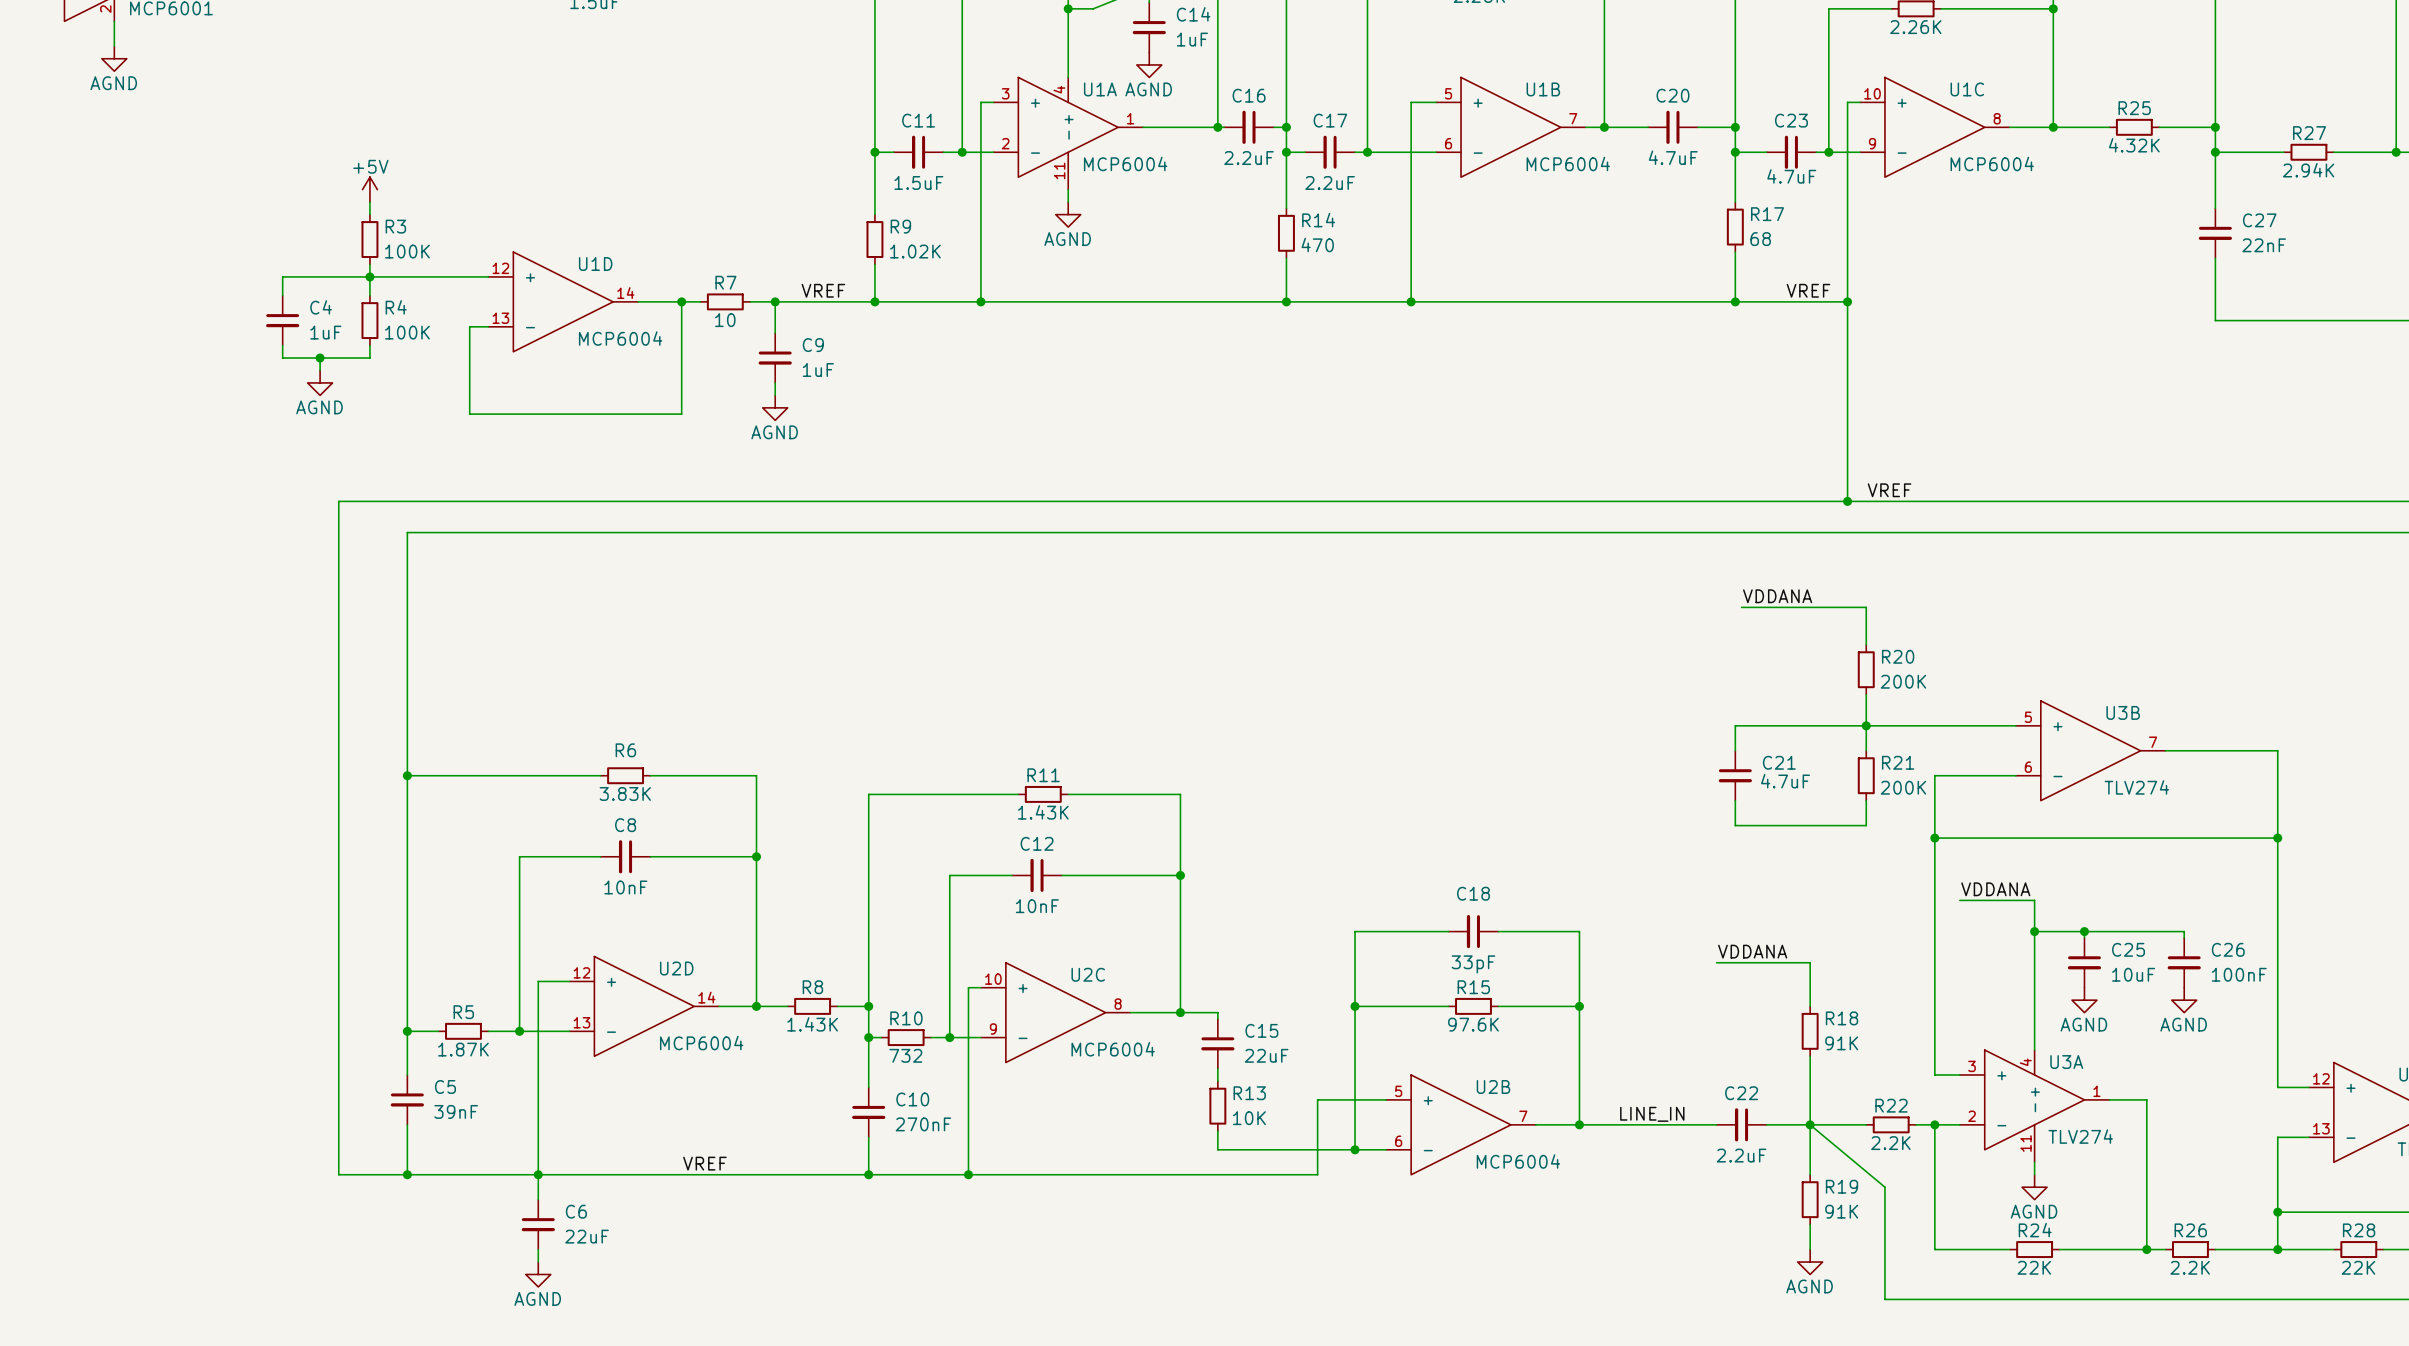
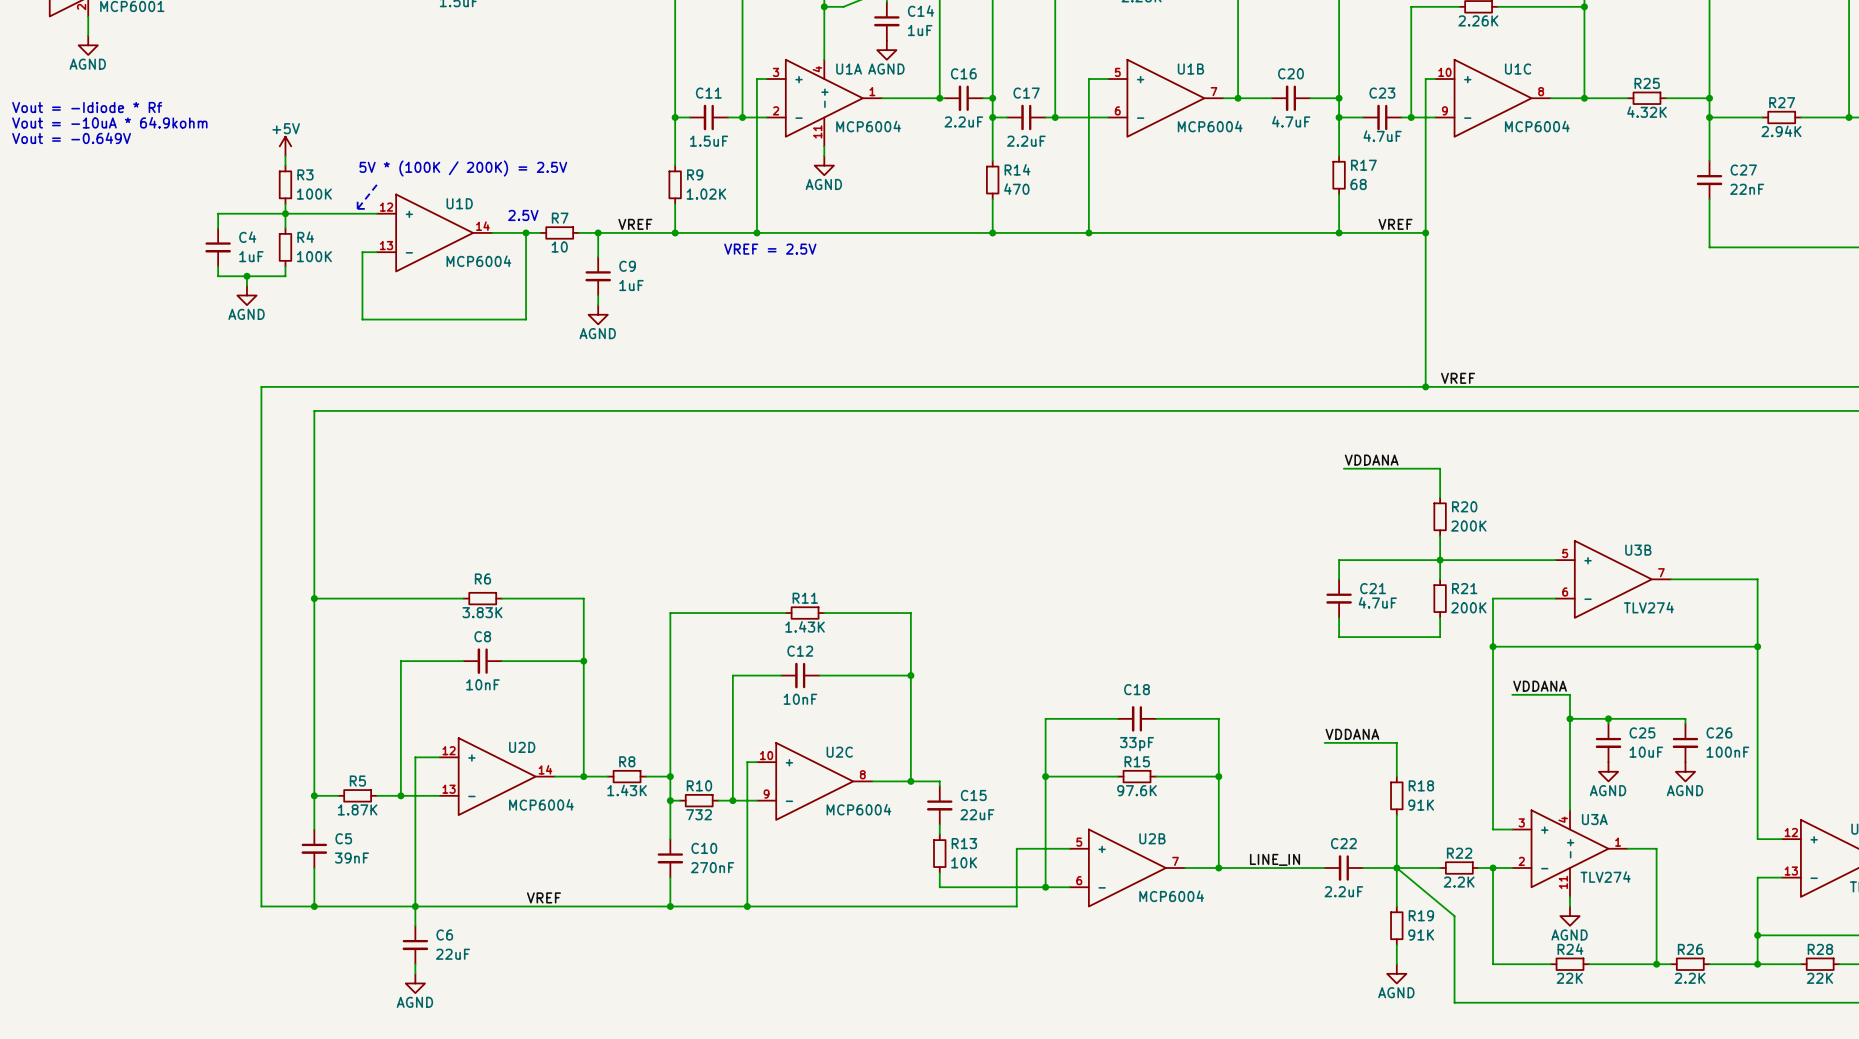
text: none -> Vout = -Idiode * Rf (87, 107)
text: none -> Vout = -10uA * 64.9kohm (109, 122)
text: none -> Vout = -0.649V (71, 138)
text: none -> 5V * (100K / 200K) = 2.5V (463, 168)
line: none -> (376, 184) (357, 208)
line: none -> (357, 199) (357, 208)
line: none -> (357, 208) (367, 208)
text: none -> 2.5V (523, 215)
text: none -> VREF = 2.5V (770, 249)

